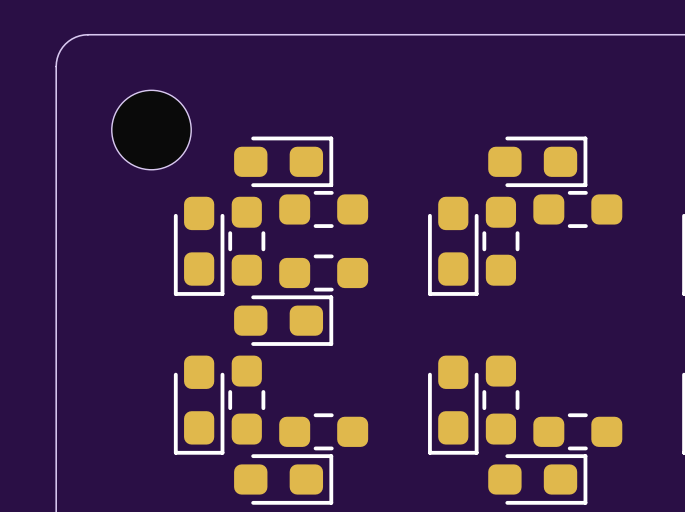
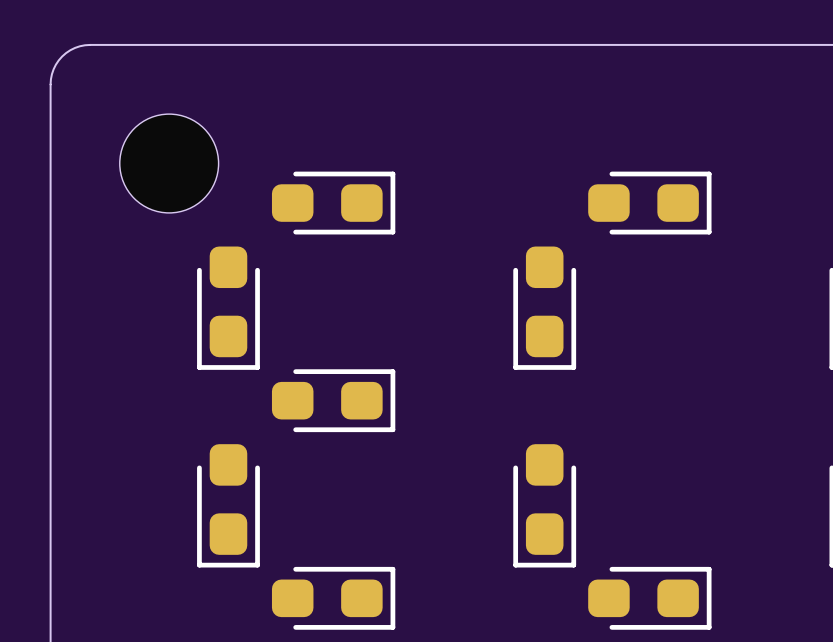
part: (323, 209) -> none
part: (577, 209) -> none
part: (246, 241) -> none
part: (500, 241) -> none
part: (323, 273) -> none
part: (246, 400) -> none
part: (500, 400) -> none
part: (323, 431) -> none
part: (577, 431) -> none

